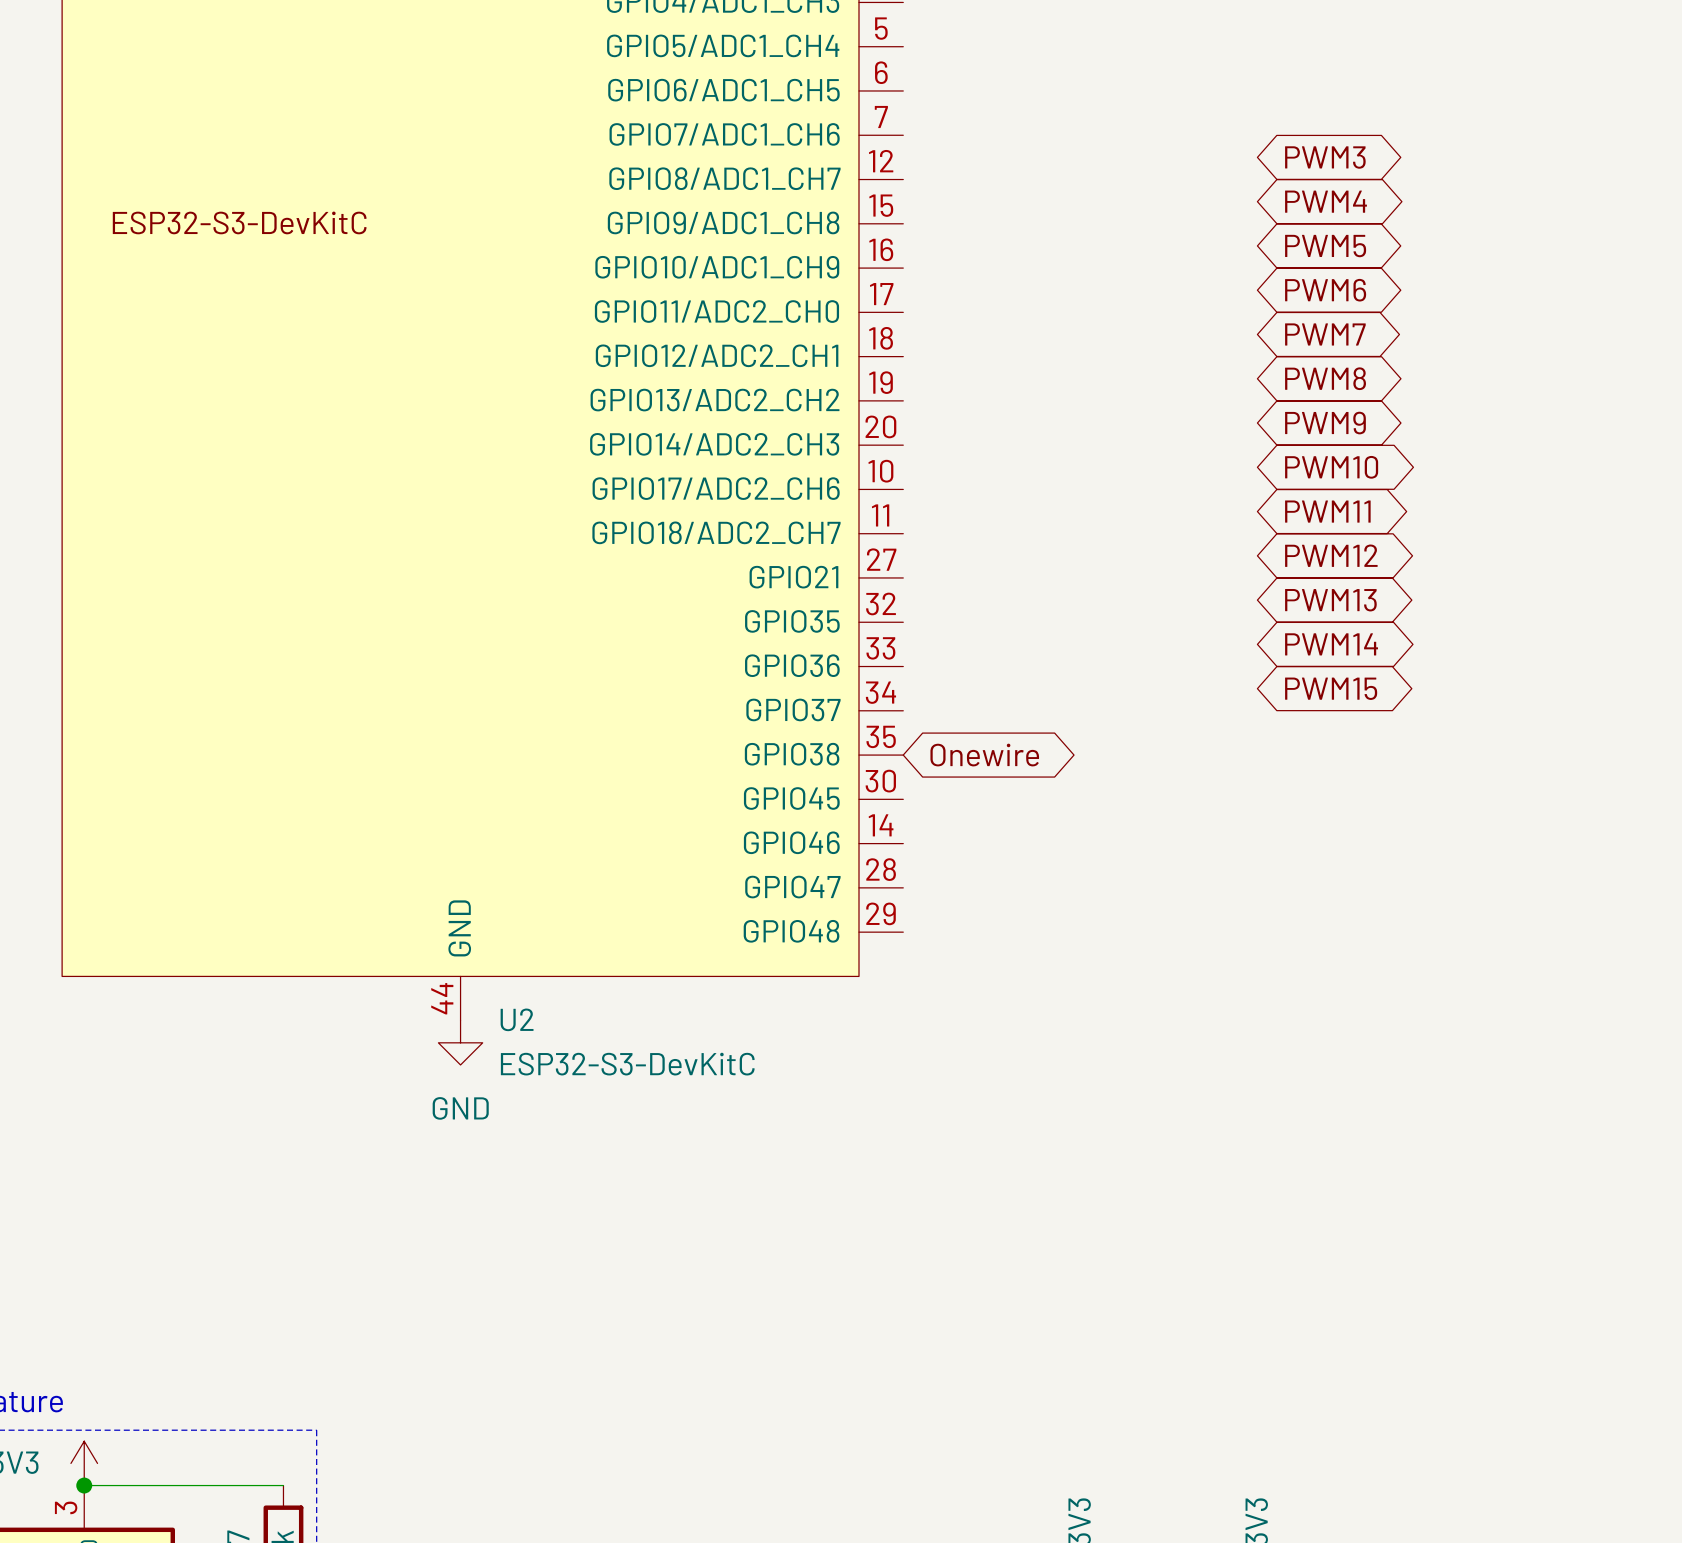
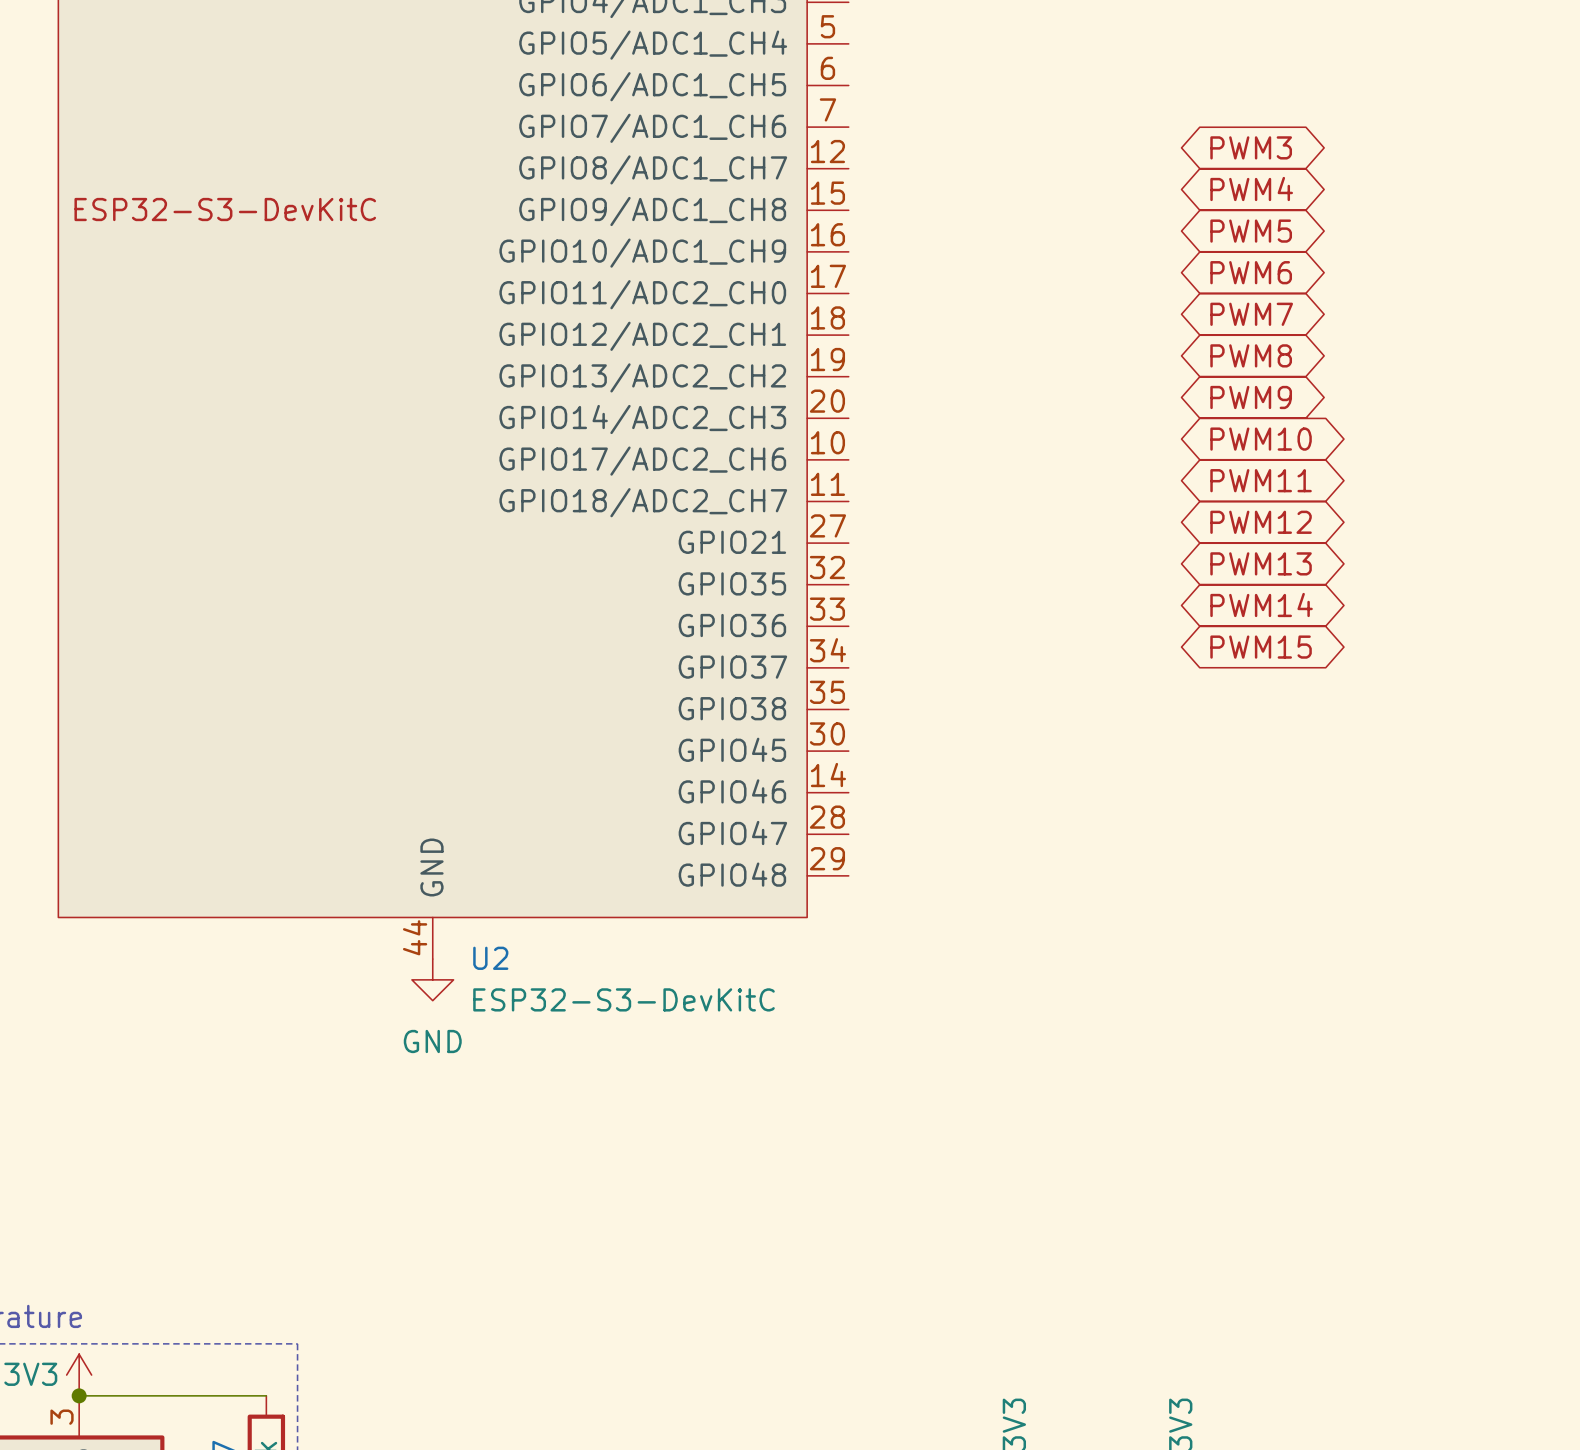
global label: Onewire (984, 755) -> none

